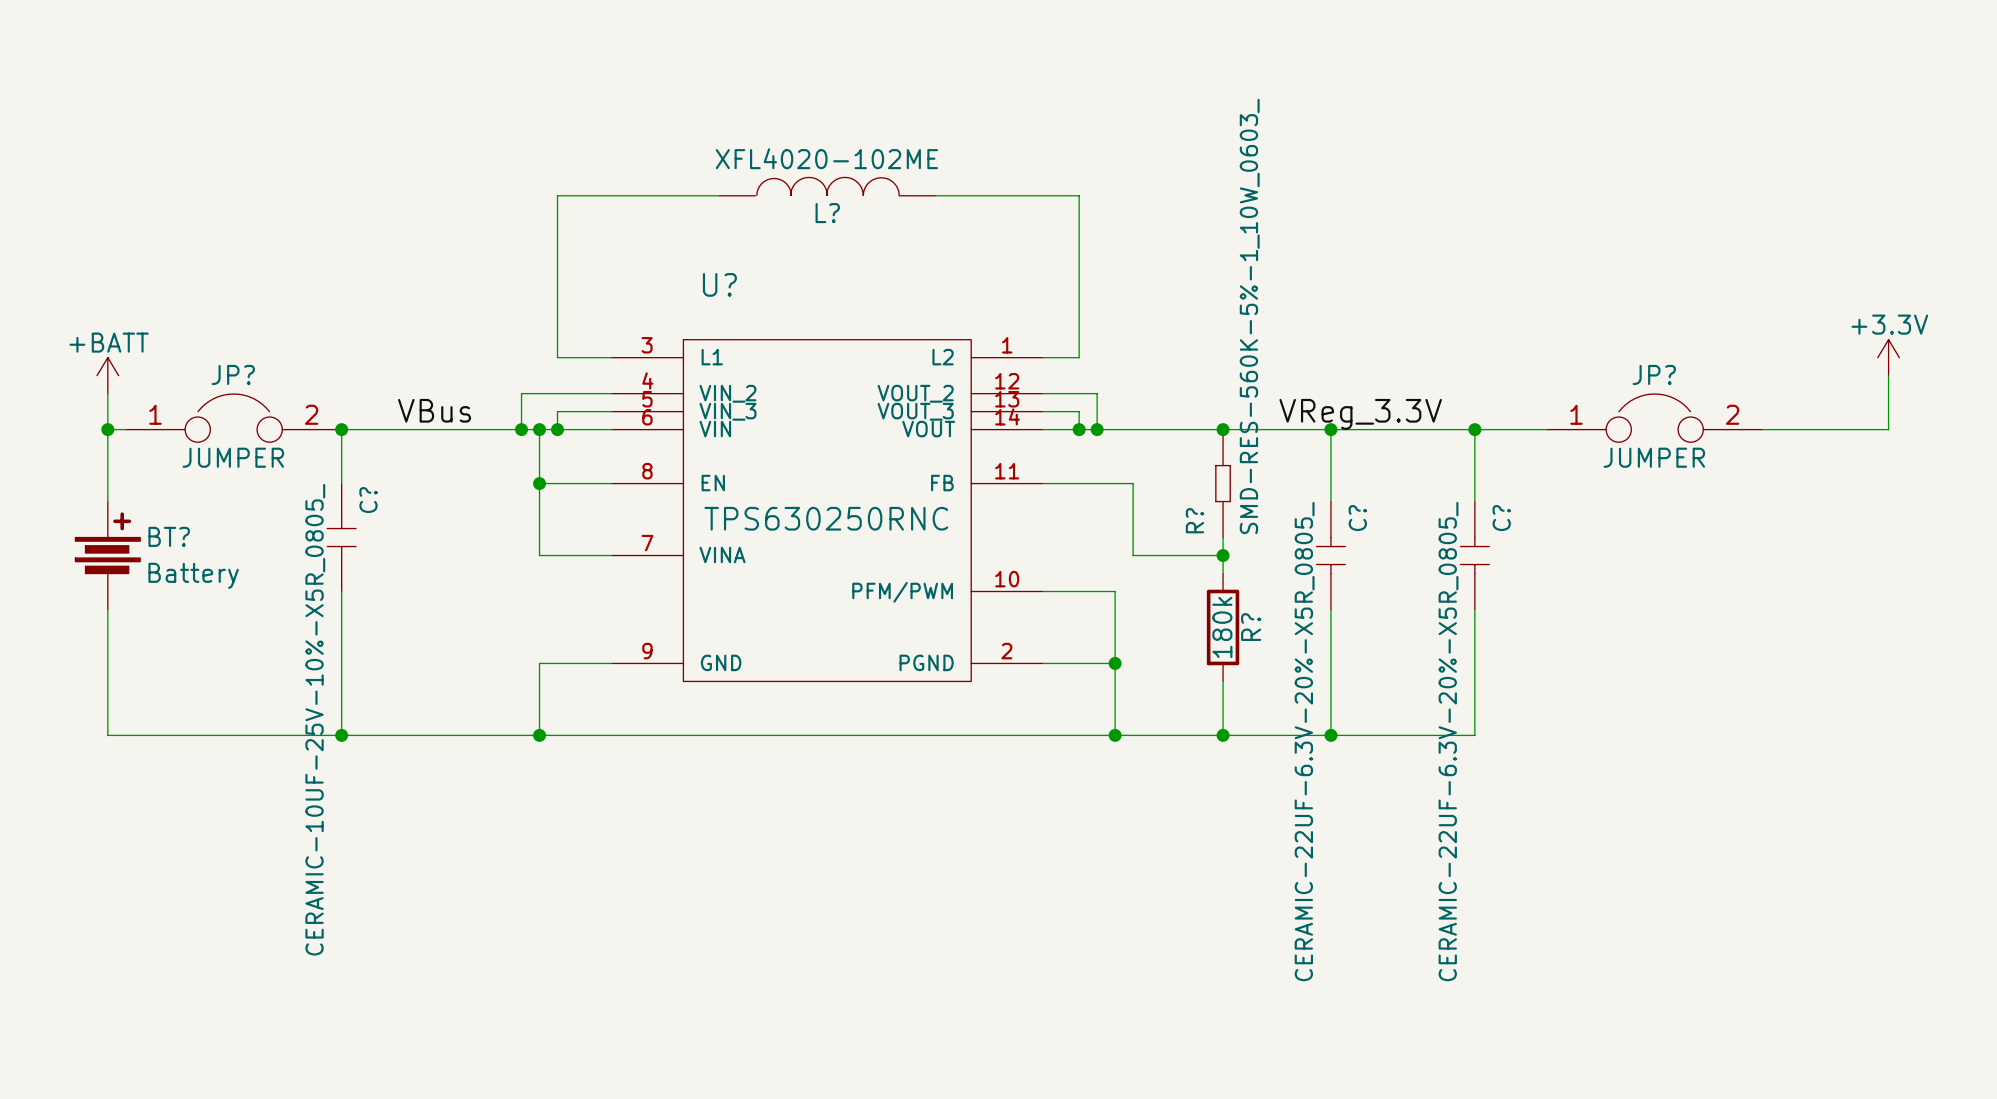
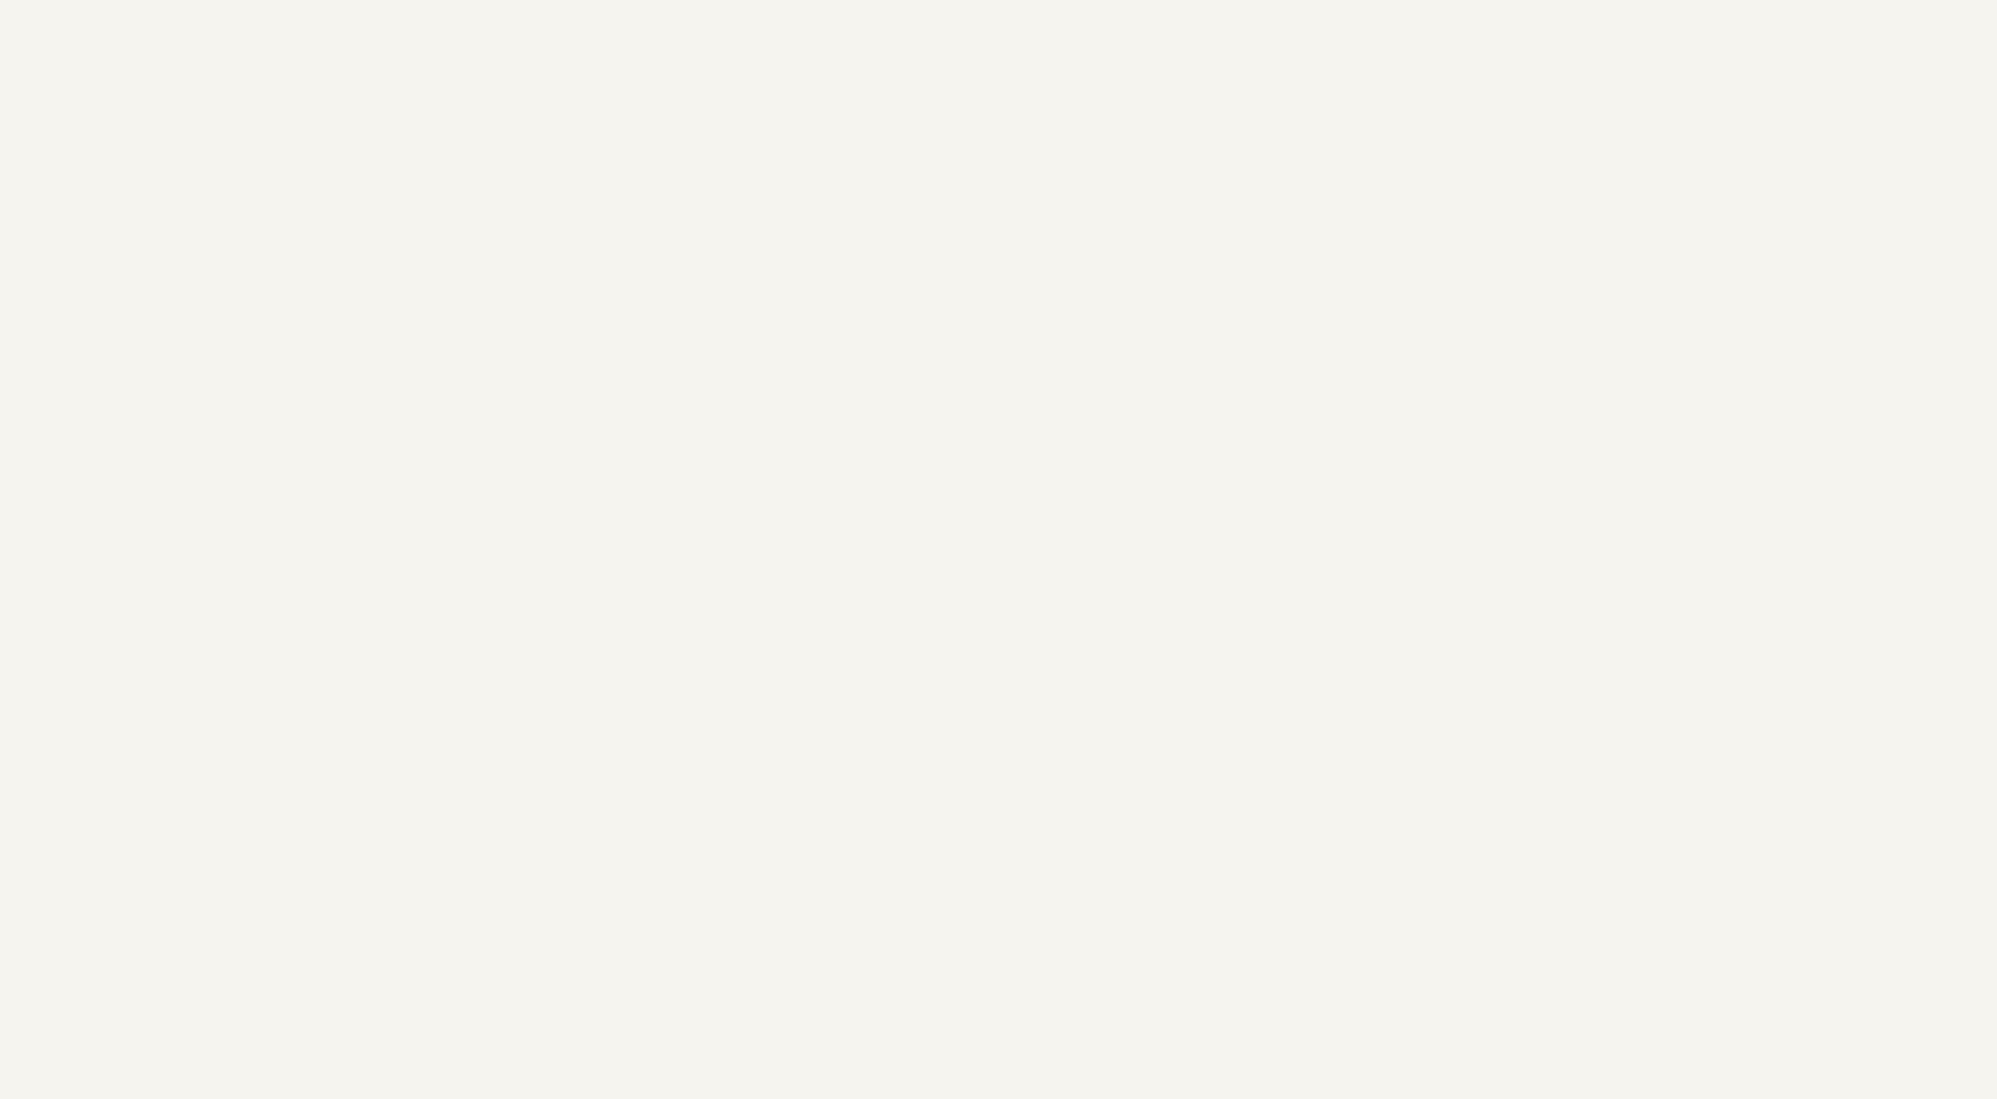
L?: XFL4020-102ME (827, 186) -> none
wire: (719, 195) (557, 195) (557, 357) (611, 357) -> none
wire: (935, 195) (1079, 195) (1079, 357) (1043, 357) -> none
power symbol: +3.3V (1888, 357) -> none
power symbol: +BATT (107, 375) -> none
wire: (1888, 375) (1888, 429) (1762, 429) -> none
wire: (107, 393) (107, 501) -> none
wire: (611, 393) (521, 393) (521, 429) -> none
wire: (1043, 393) (1097, 393) (1097, 429) -> none
label: VBus (434, 410) -> none
wire: (611, 411) (557, 411) (557, 429) -> none
wire: (1043, 411) (1079, 411) (1079, 429) -> none
label: VReg_3.3V (1360, 414) -> none
JP?: JUMPER (233, 418) -> none
JP?: JUMPER (1654, 418) -> none
wire: (107, 429) (125, 429) -> none
junction: (107, 429) -> none
junction: (341, 429) -> none
junction: (521, 429) -> none
wire: (539, 429) (539, 555) (611, 555) -> none
junction: (539, 429) -> none
junction: (557, 429) -> none
wire: (611, 429) (341, 429) (341, 483) -> none
wire: (1043, 429) (1546, 429) -> none
junction: (1079, 429) -> none
junction: (1097, 429) -> none
junction: (1223, 429) -> none
wire: (1330, 429) (1330, 501) -> none
junction: (1330, 429) -> none
wire: (1474, 429) (1474, 501) -> none
junction: (1474, 429) -> none
wire: (539, 483) (611, 483) -> none
junction: (539, 483) -> none
wire: (1043, 483) (1133, 483) (1133, 555) (1223, 555) -> none
R?: SMD-RES-560K-5%-1_10W_0603_ (1223, 483) -> none
U?: TPS630250RNC (827, 510) -> none
C?: CERAMIC-10UF-25V-10%-X5R_0805_ (341, 537) -> none
wire: (1223, 537) (1223, 573) -> none
BT?: Battery (107, 555) -> none
junction: (1223, 555) -> none
C?: CERAMIC-22UF-6.3V-20%-X5R_0805_ (1330, 555) -> none
C?: CERAMIC-22UF-6.3V-20%-X5R_0805_ (1474, 555) -> none
wire: (341, 591) (341, 735) -> none
wire: (1043, 591) (1115, 591) (1115, 735) -> none
wire: (107, 609) (107, 735) (1474, 735) (1474, 609) -> none
wire: (1330, 609) (1330, 735) -> none
R?: 180k (1223, 627) -> none
wire: (611, 663) (539, 663) (539, 735) -> none
wire: (1043, 663) (1115, 663) -> none
junction: (1115, 663) -> none
wire: (1223, 681) (1223, 735) -> none
junction: (341, 735) -> none
junction: (539, 735) -> none
junction: (1115, 735) -> none
junction: (1223, 735) -> none
junction: (1330, 735) -> none

